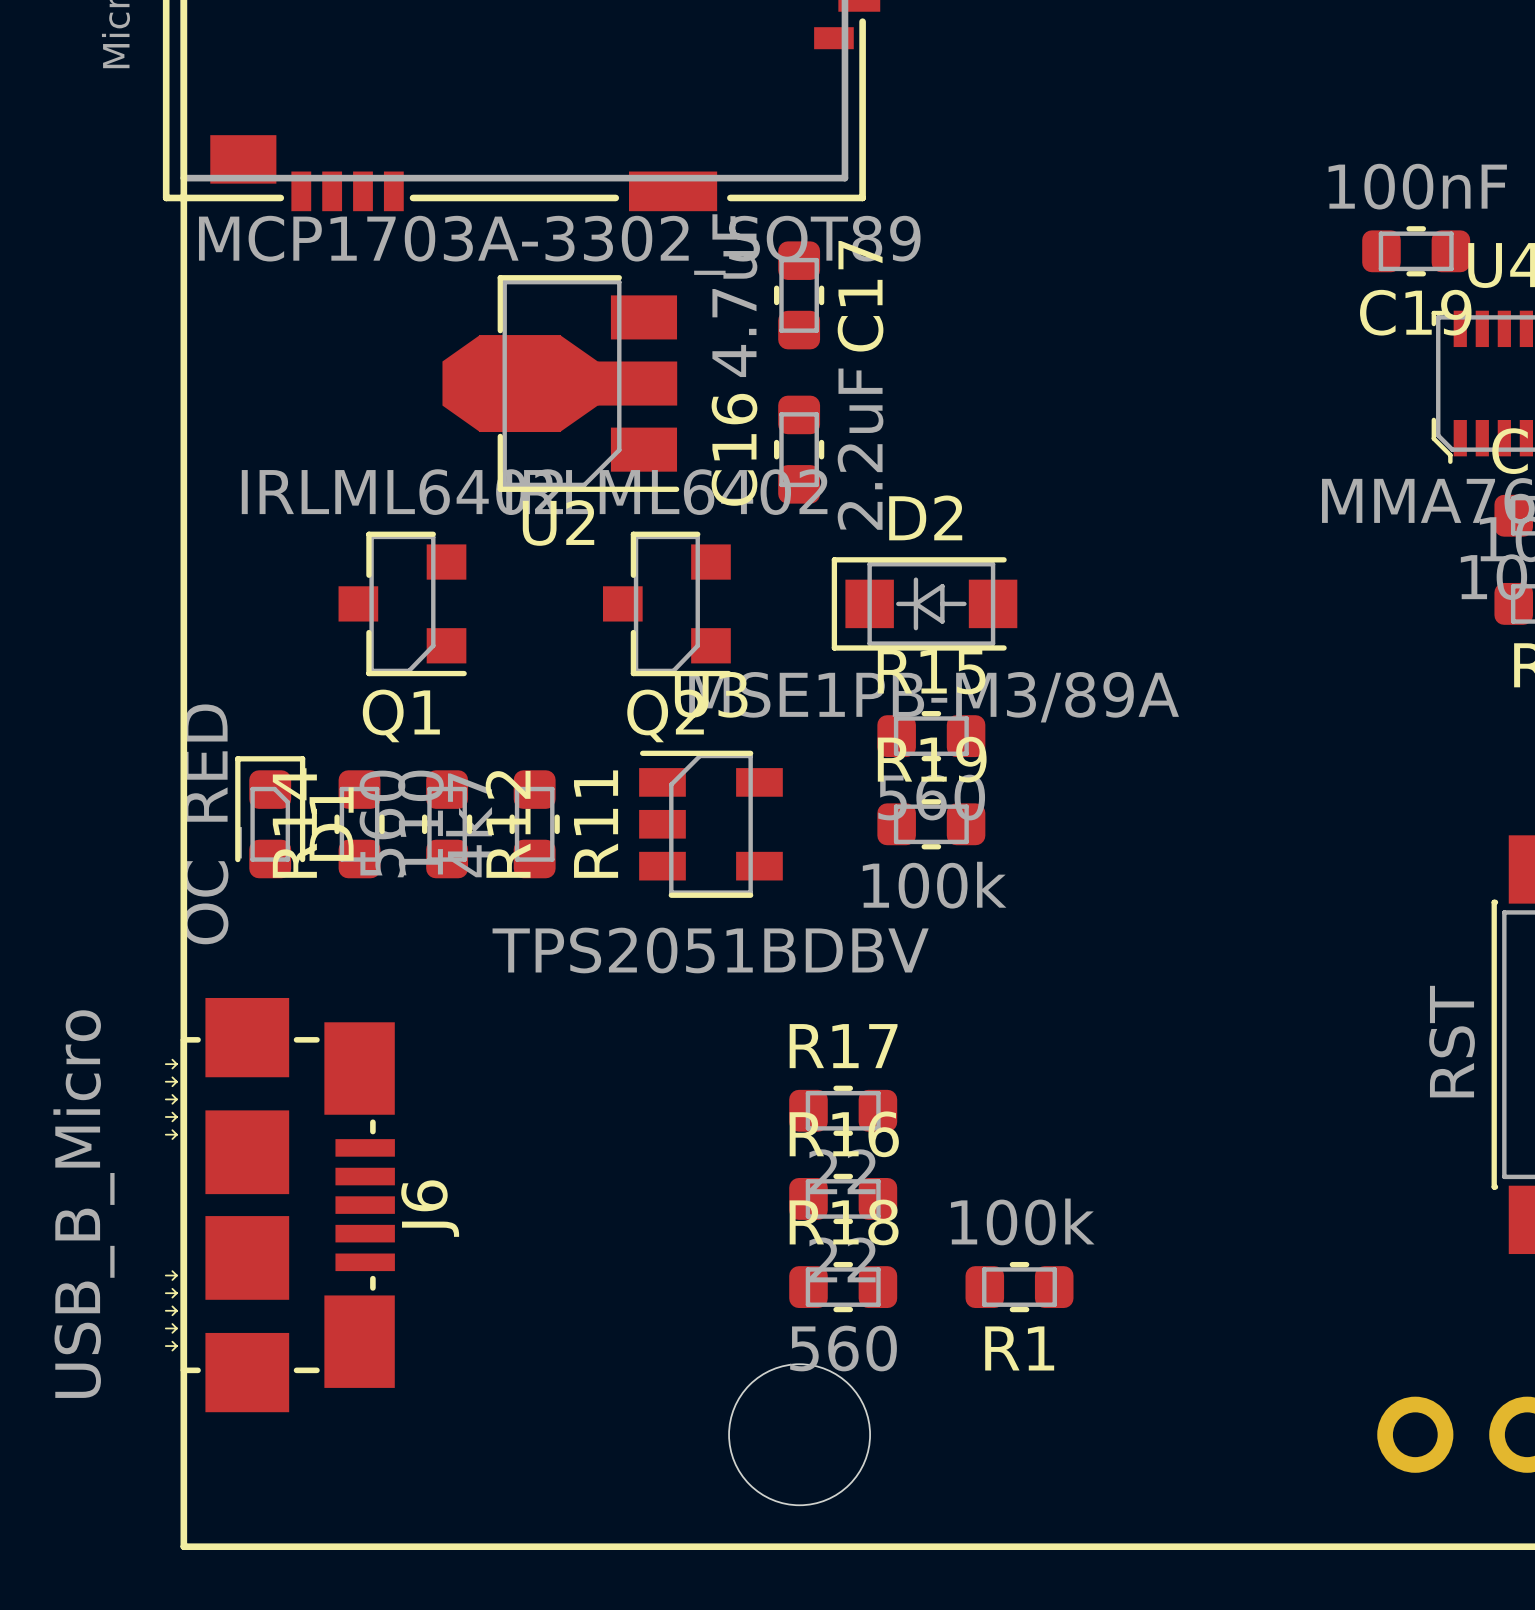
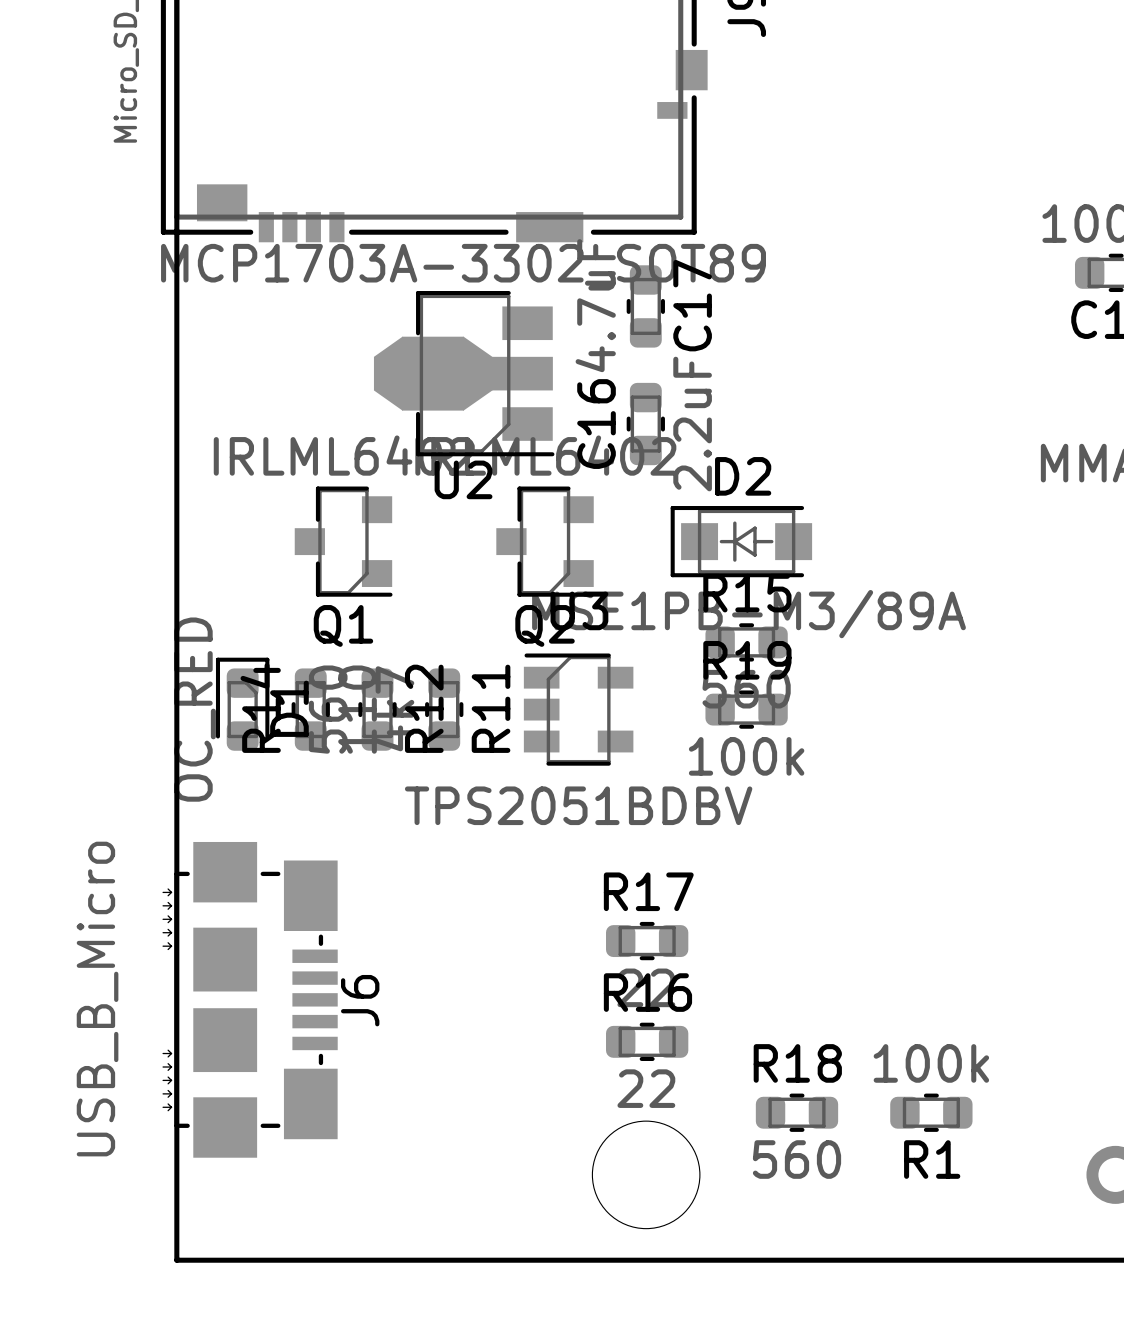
R17 position: (843, 1110) -> (647, 941)
R16 position: (843, 1198) -> (647, 1041)
R18 position: (843, 1287) -> (796, 1112)
R1 position: (1019, 1287) -> (931, 1112)

